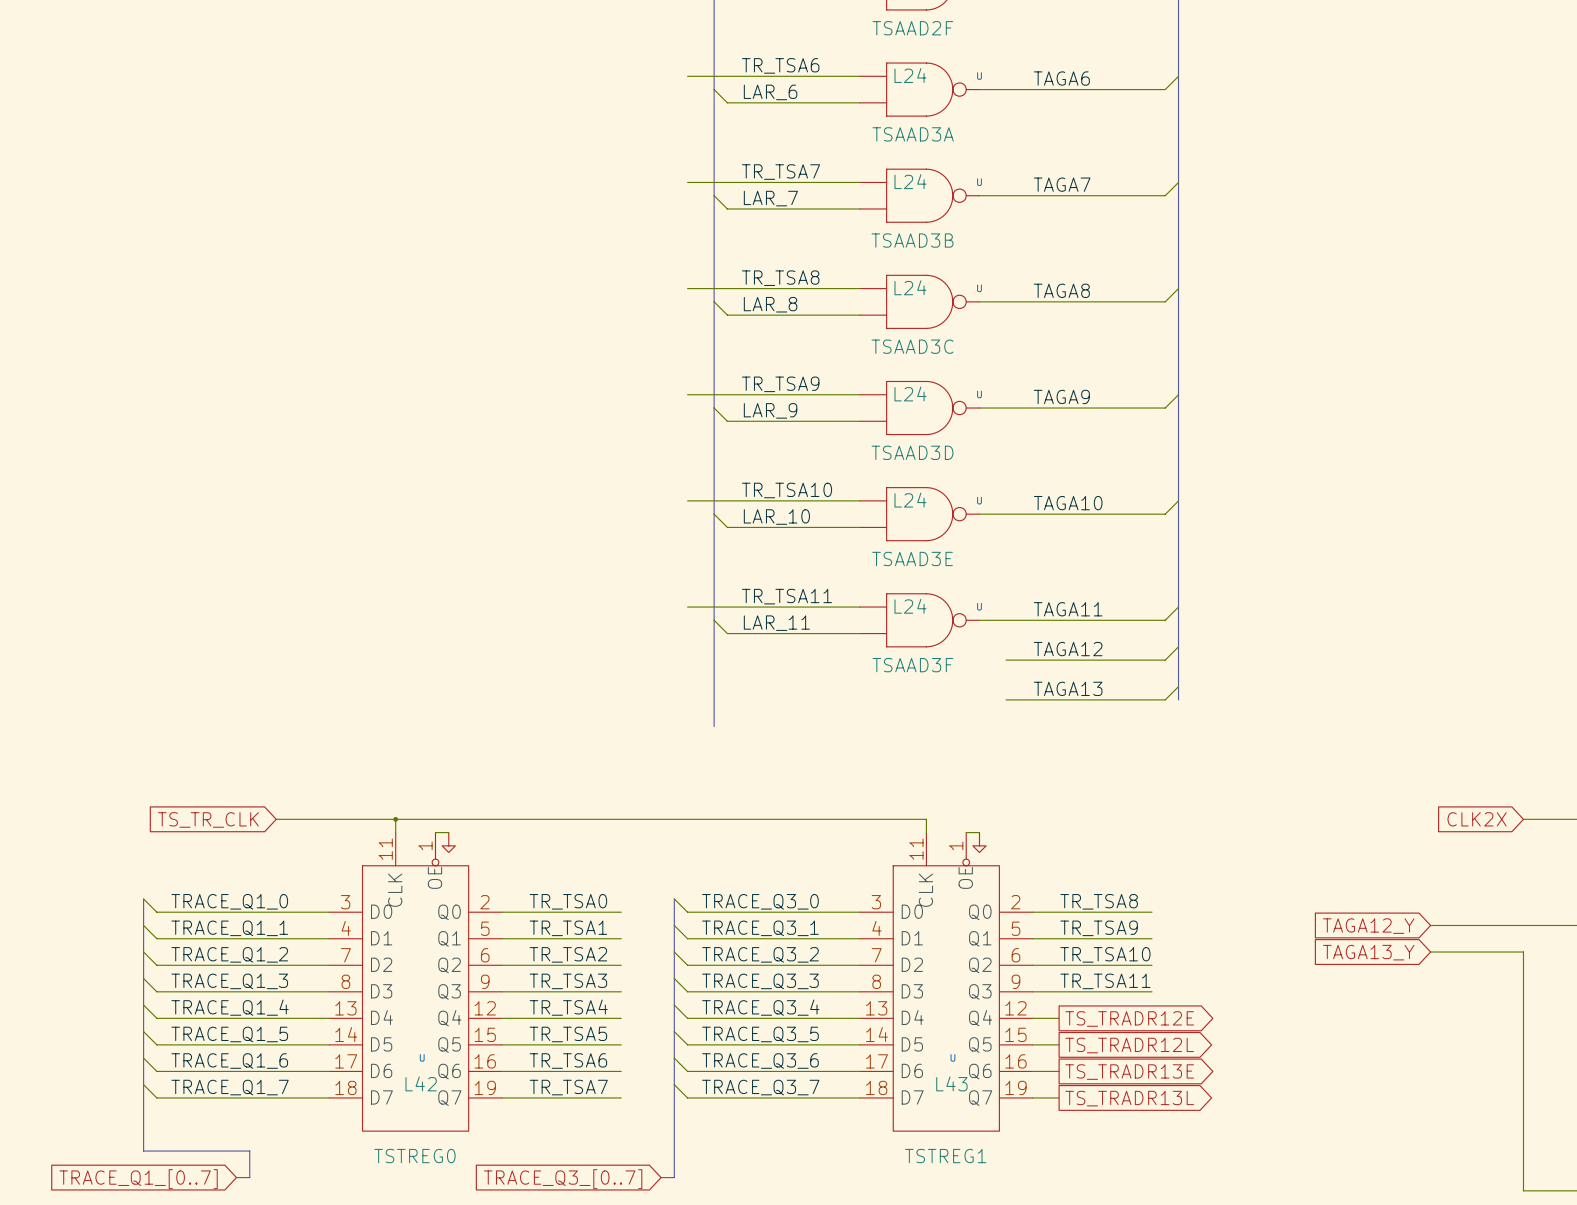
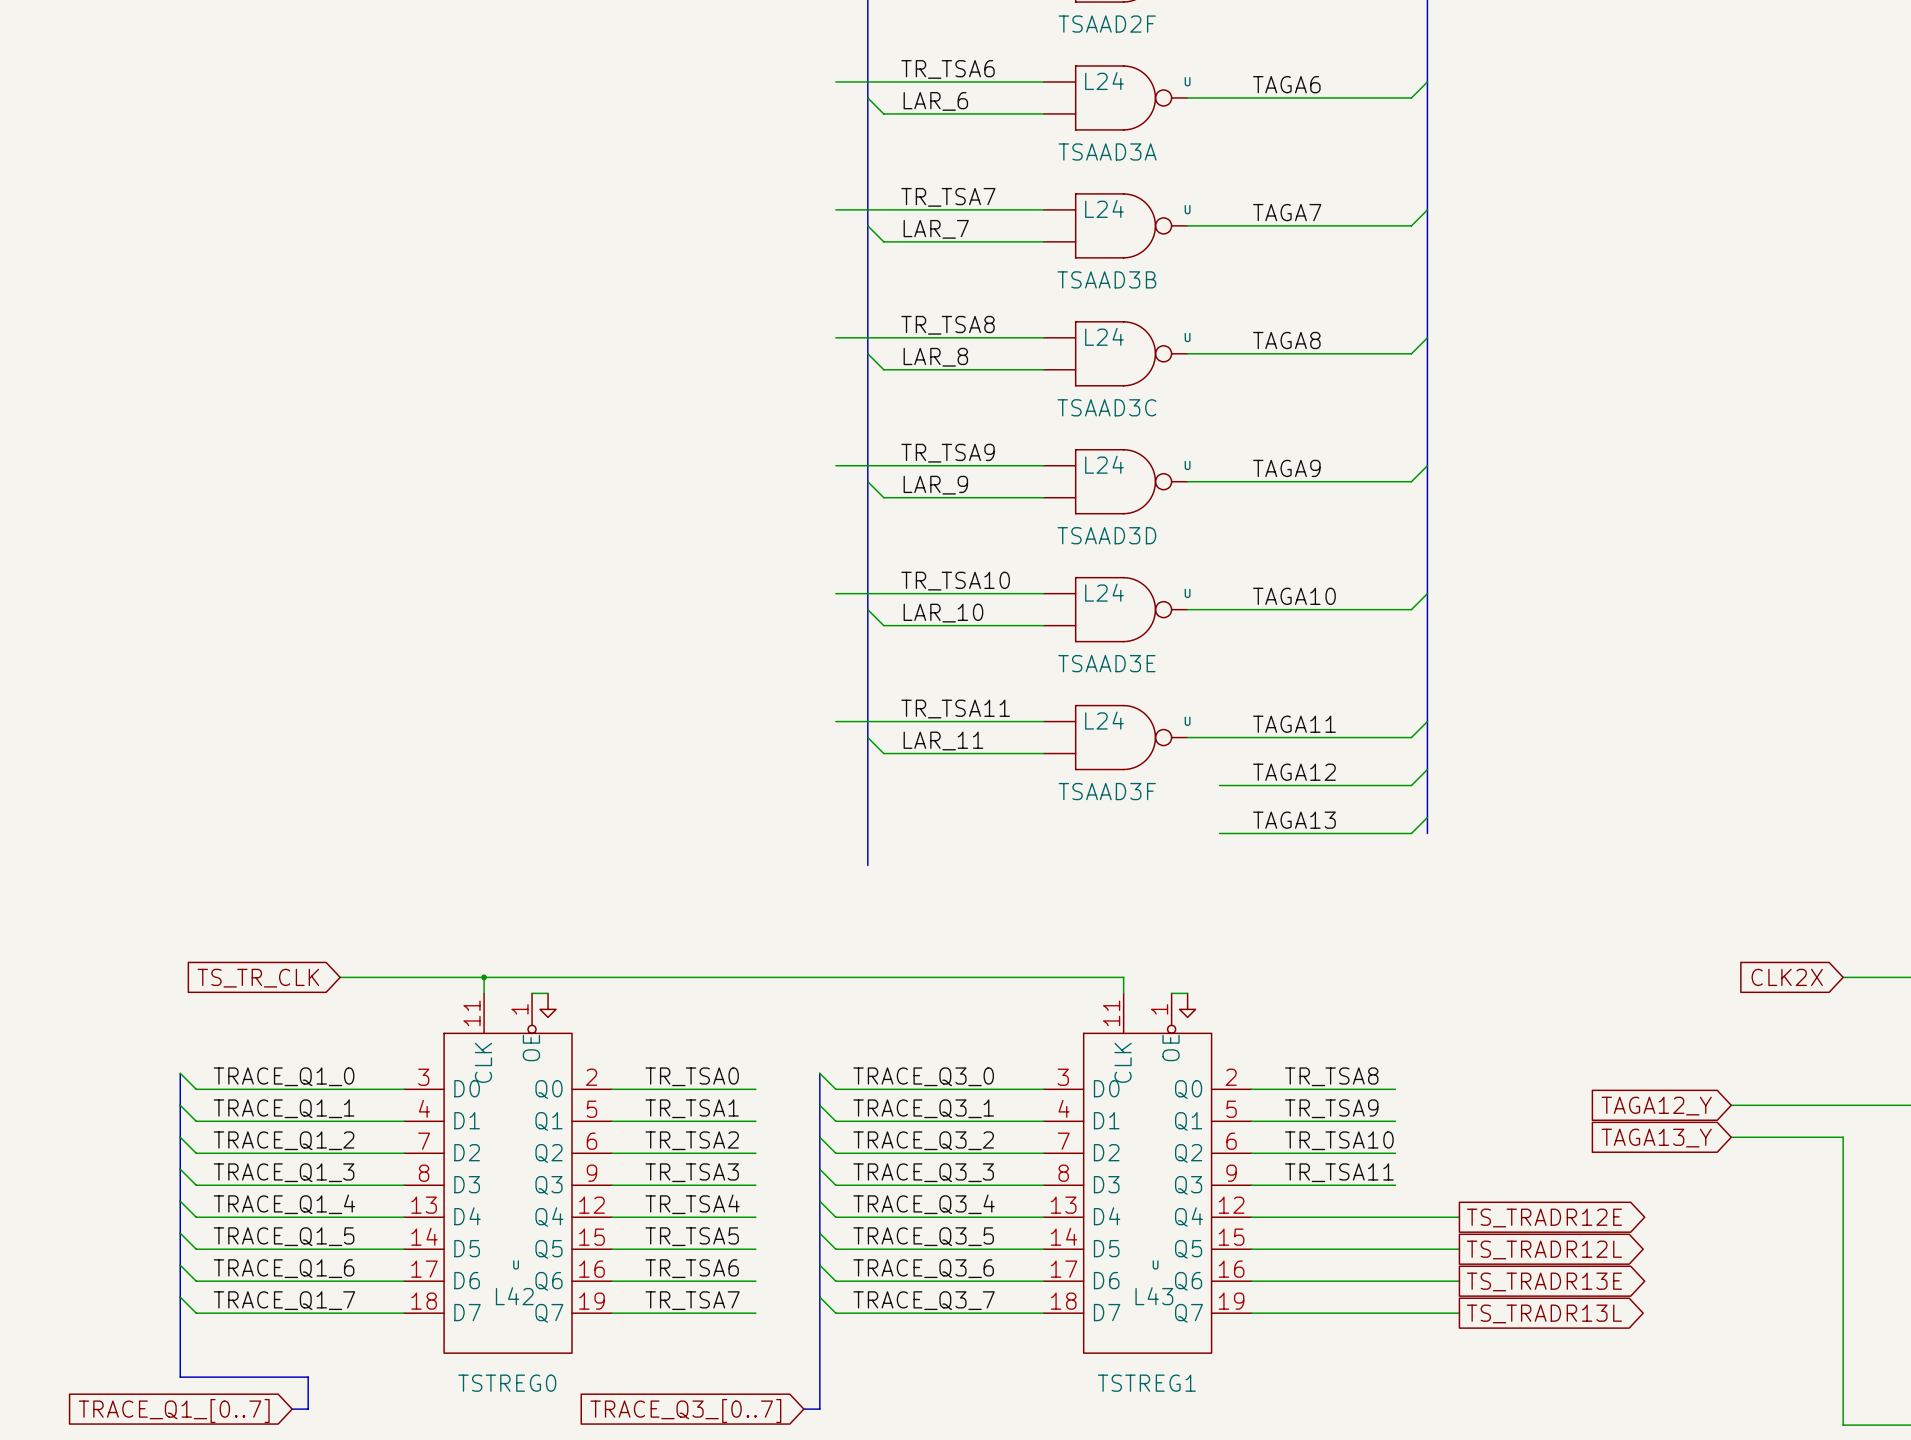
wire: none -> (1283, 1217) (1459, 1217)
global label: TS_TRADR12E (1129, 1018) -> none
global label: none -> TS_TRADR12E (1544, 1218)
wire: none -> (1283, 1249) (1459, 1249)
global label: TS_TRADR12L (1129, 1045) -> none
global label: none -> TS_TRADR12L (1544, 1249)
wire: none -> (1283, 1281) (1459, 1281)
global label: TS_TRADR13E (1129, 1072) -> none
global label: none -> TS_TRADR13E (1544, 1281)
wire: none -> (1283, 1313) (1459, 1313)
global label: TS_TRADR13L (1129, 1098) -> none
global label: none -> TS_TRADR13L (1544, 1313)

